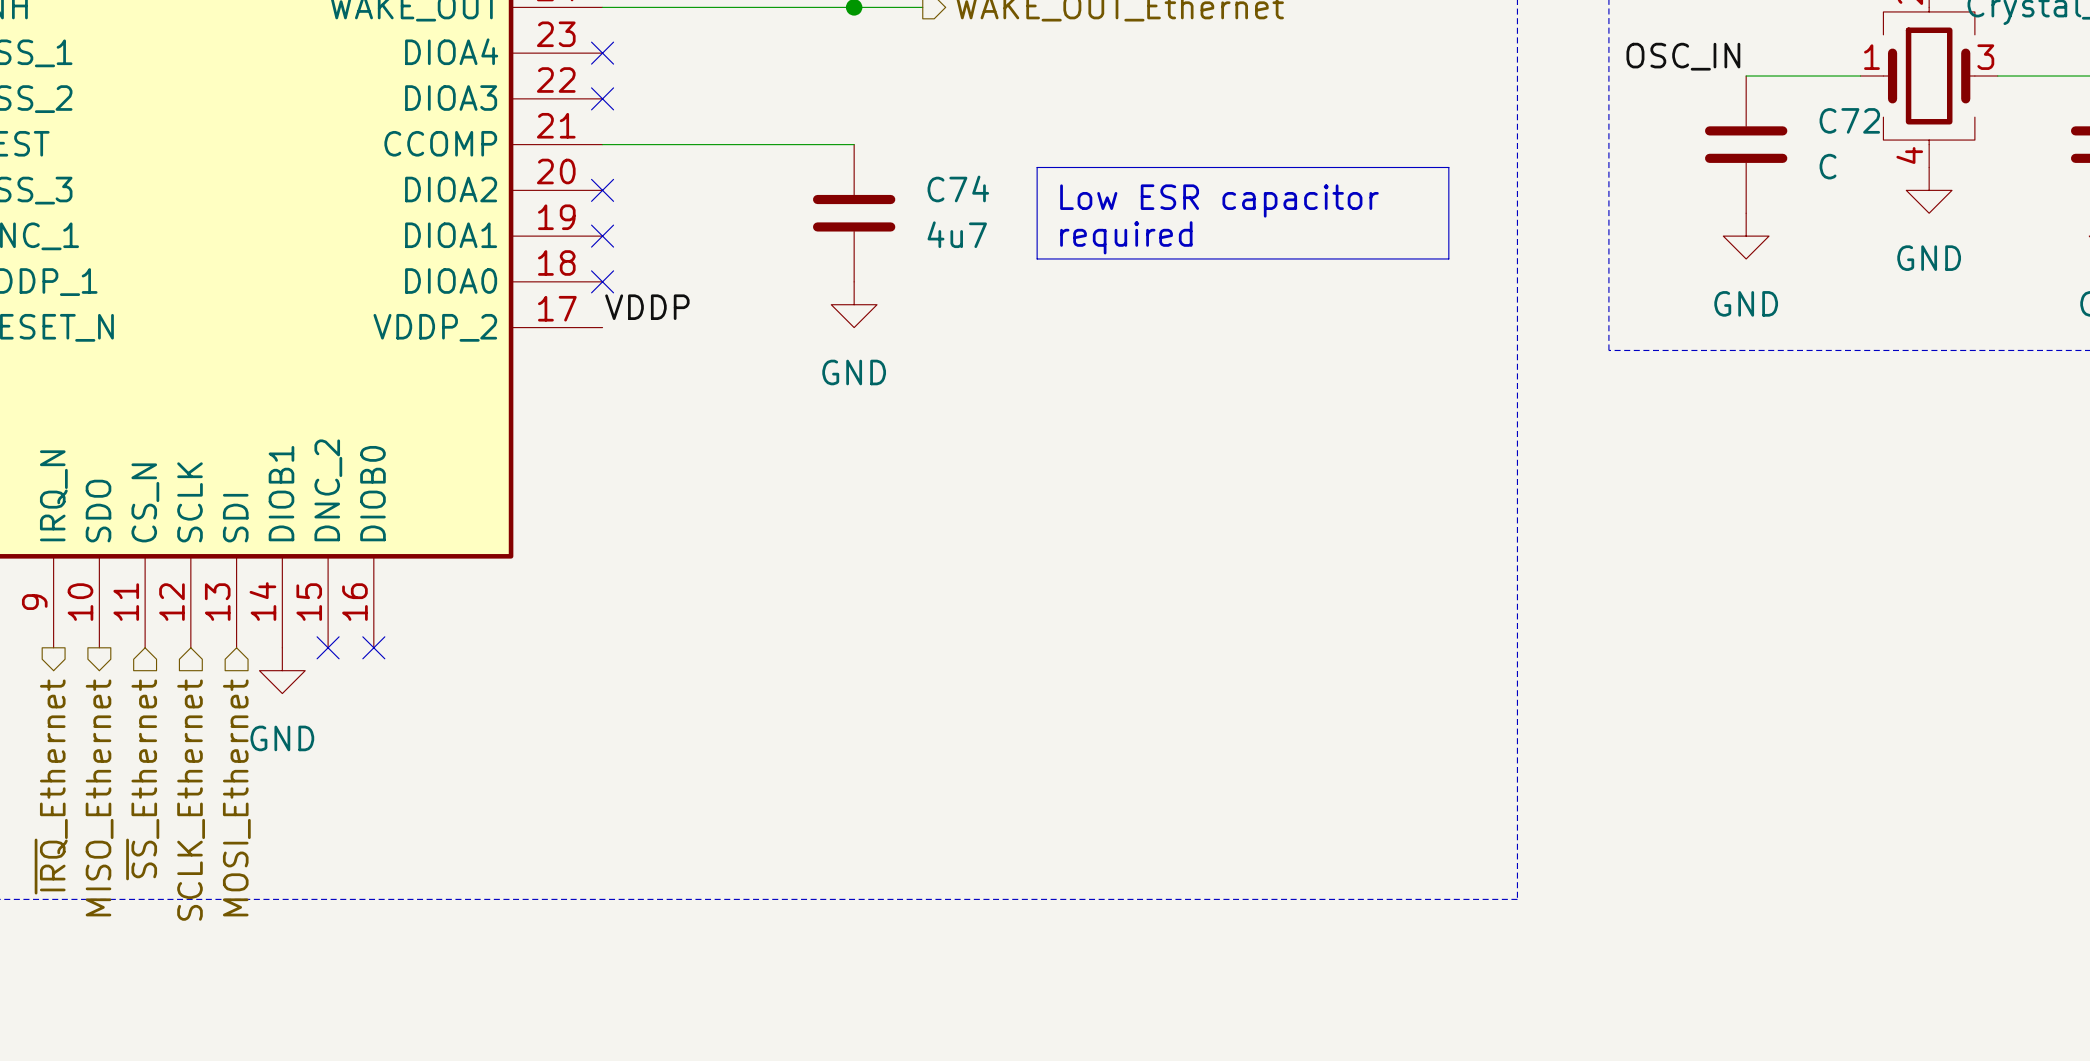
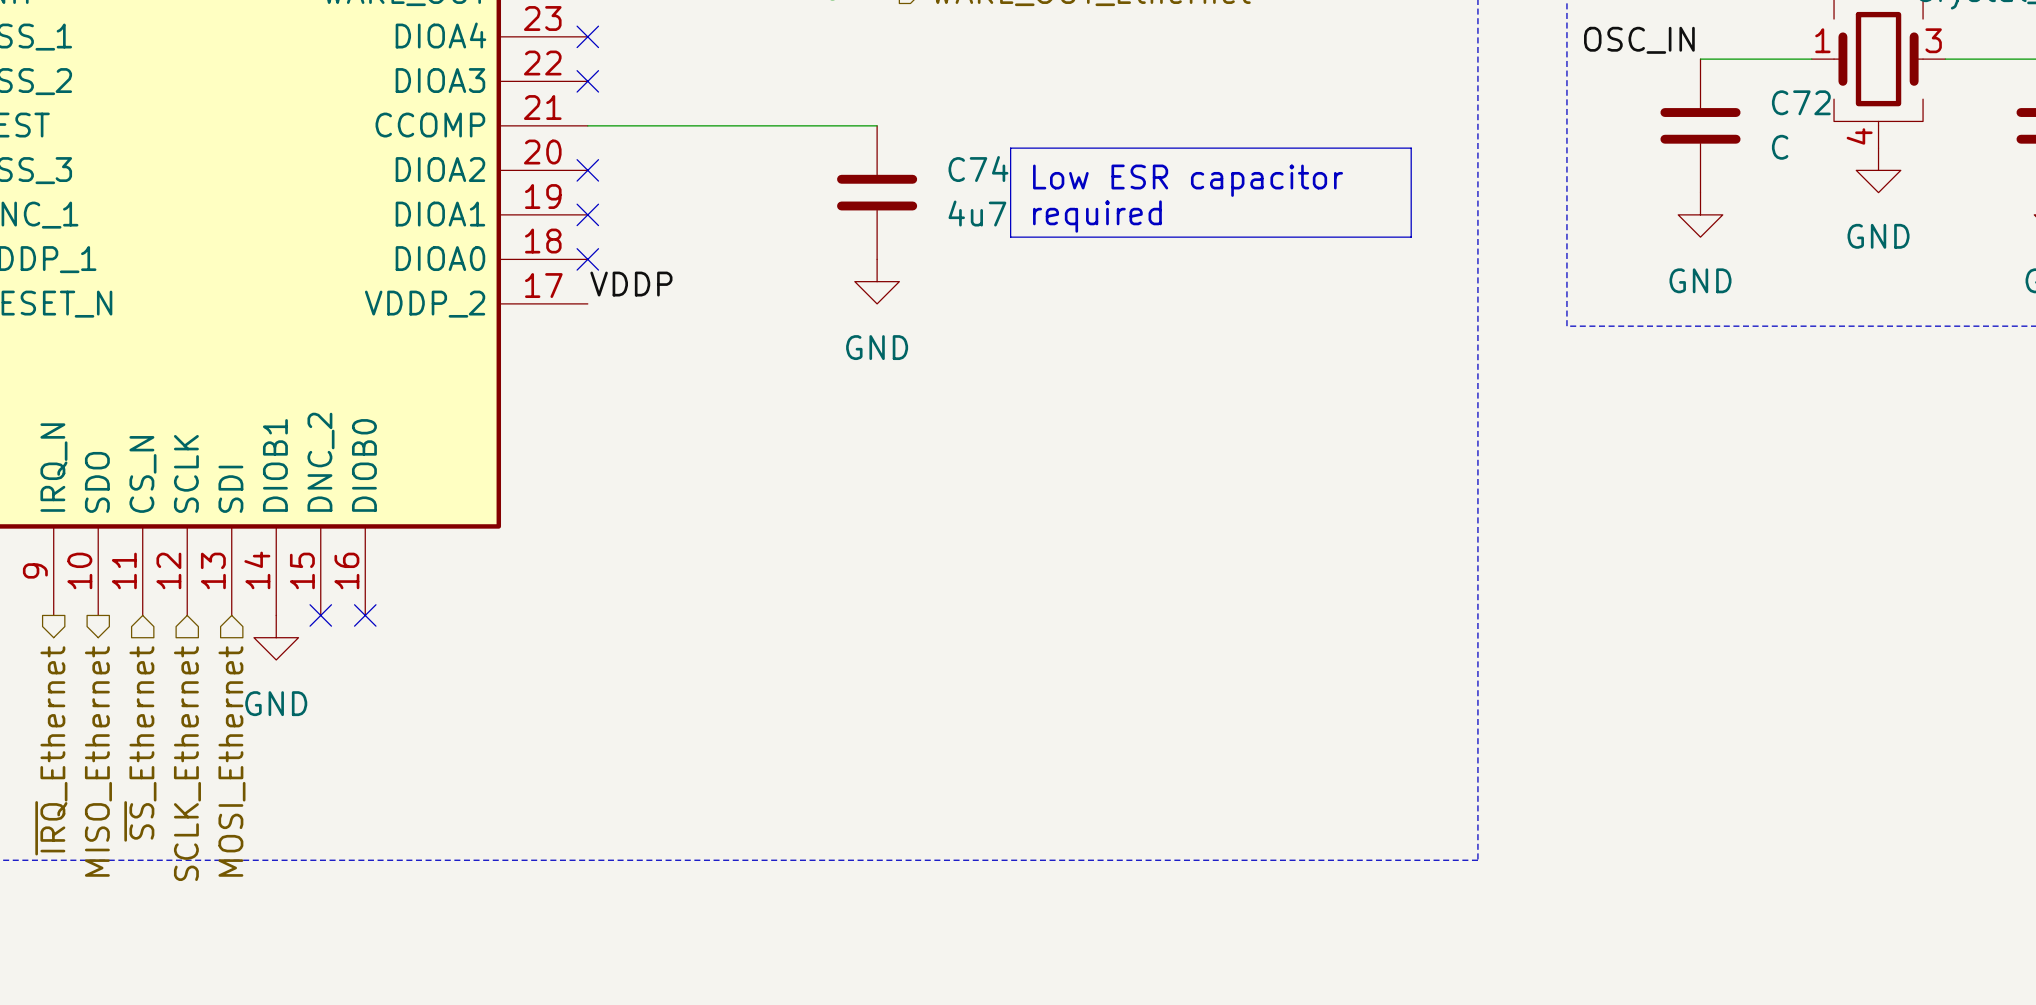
wire: none -> (832, 125) (877, 125)
C74 position: (854, 213) -> (877, 192)
power symbol position: GND (854, 304) -> GND (877, 281)

